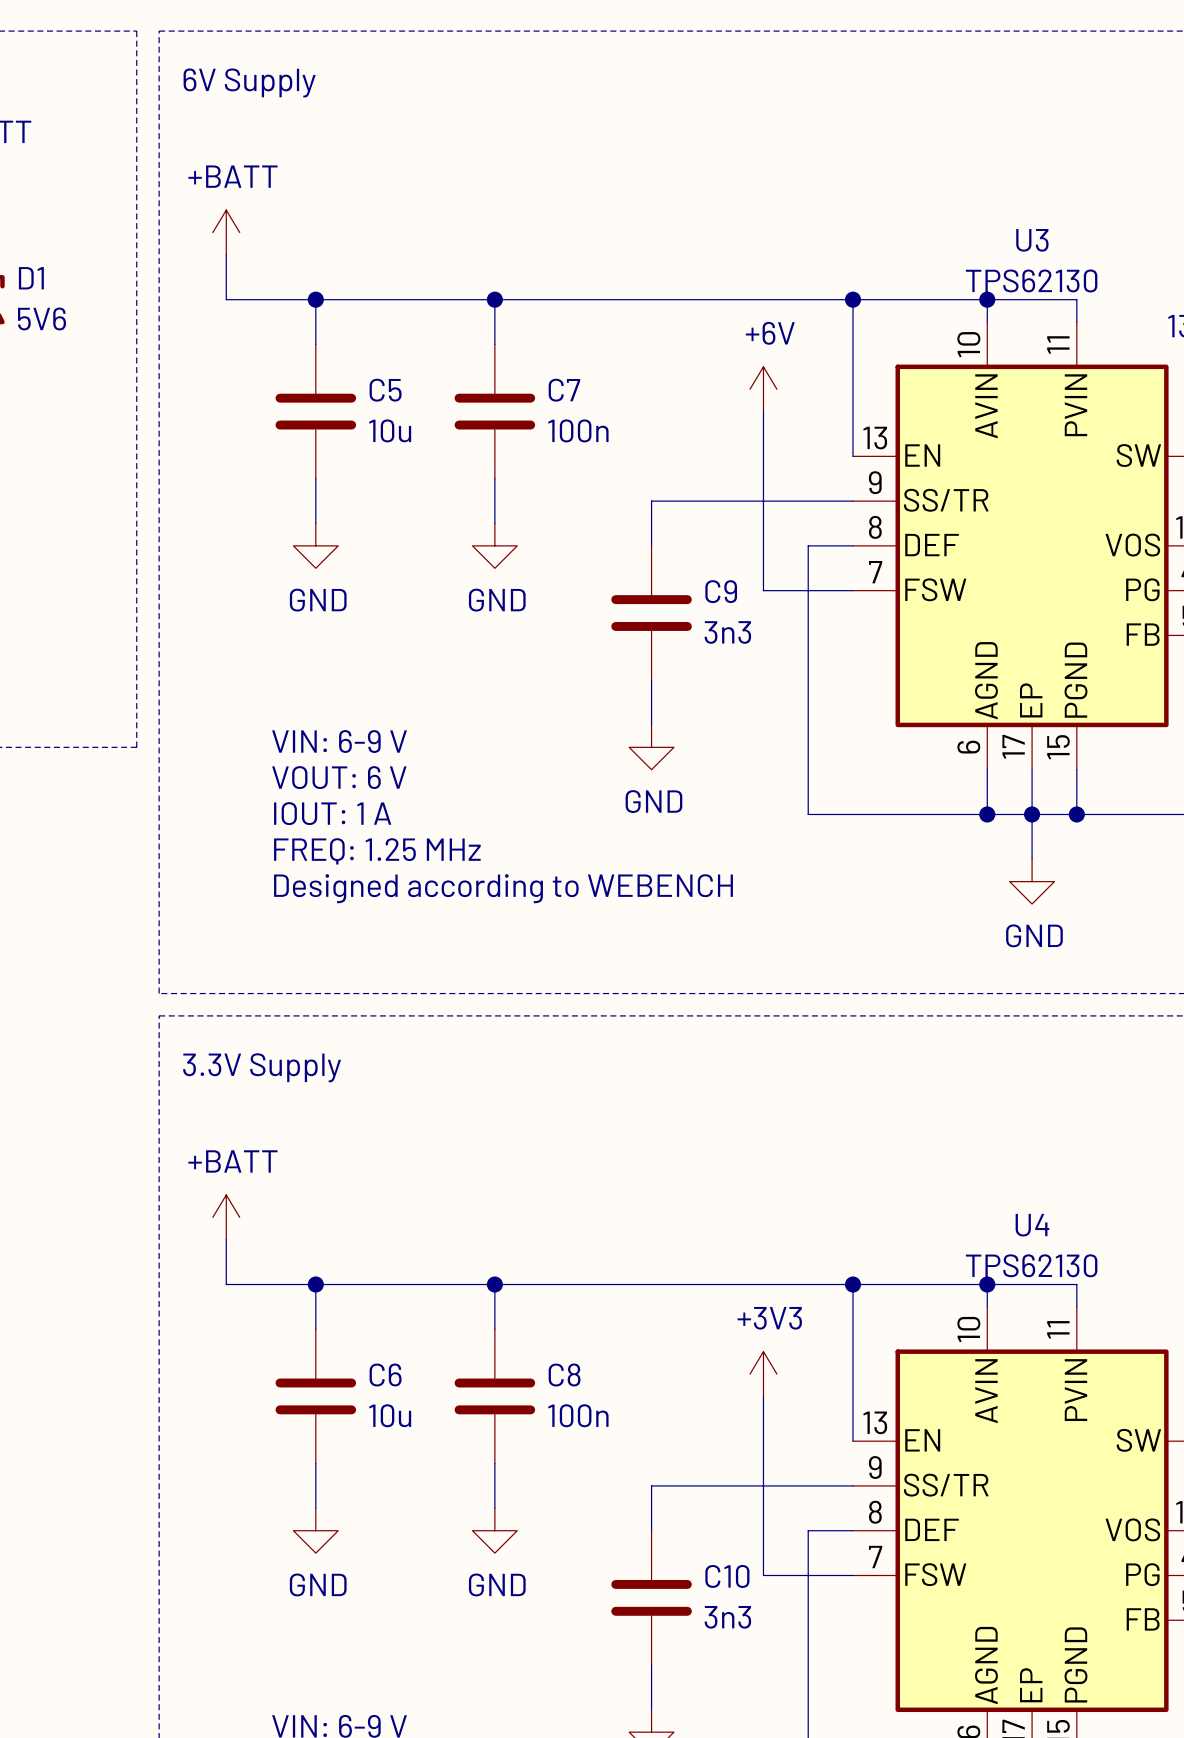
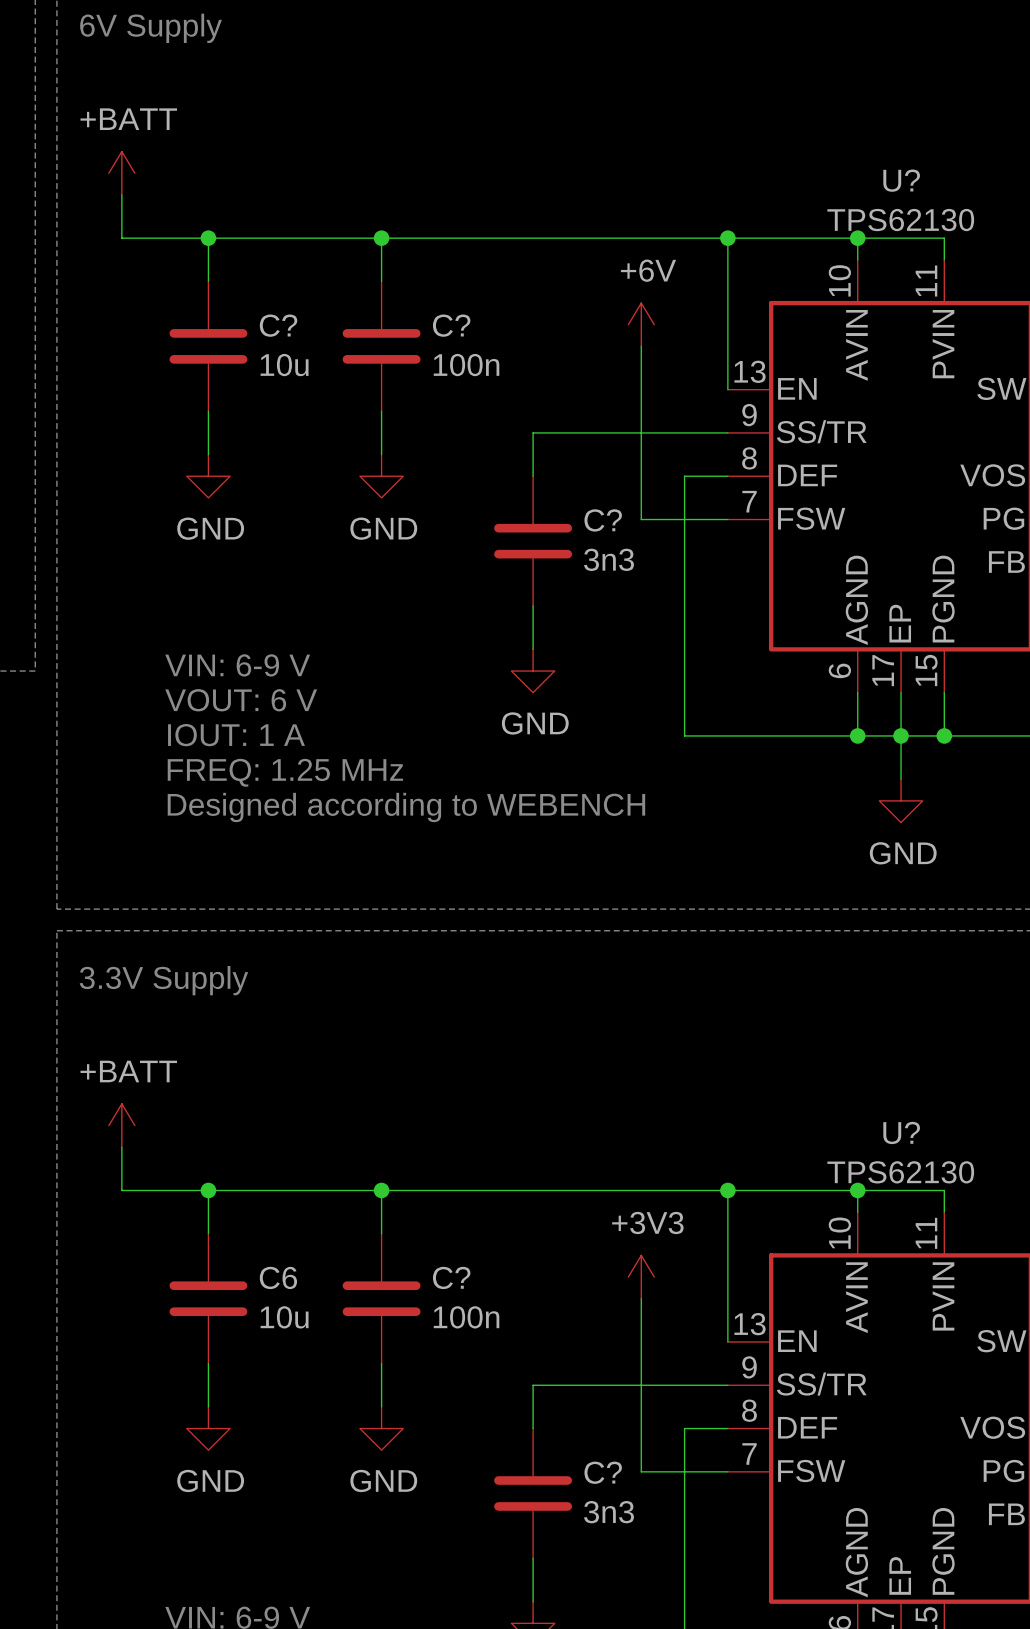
U3 name: U3 (1032, 240) -> U? (901, 180)
C5 name: C5 (385, 390) -> C? (278, 325)
C7 name: C7 (564, 390) -> C? (451, 325)
C9 name: C9 (721, 591) -> C? (603, 520)
U4 name: U4 (1032, 1225) -> U? (901, 1132)
C8 name: C8 (564, 1374) -> C? (451, 1277)
C10 name: C10 (727, 1576) -> C? (603, 1472)

